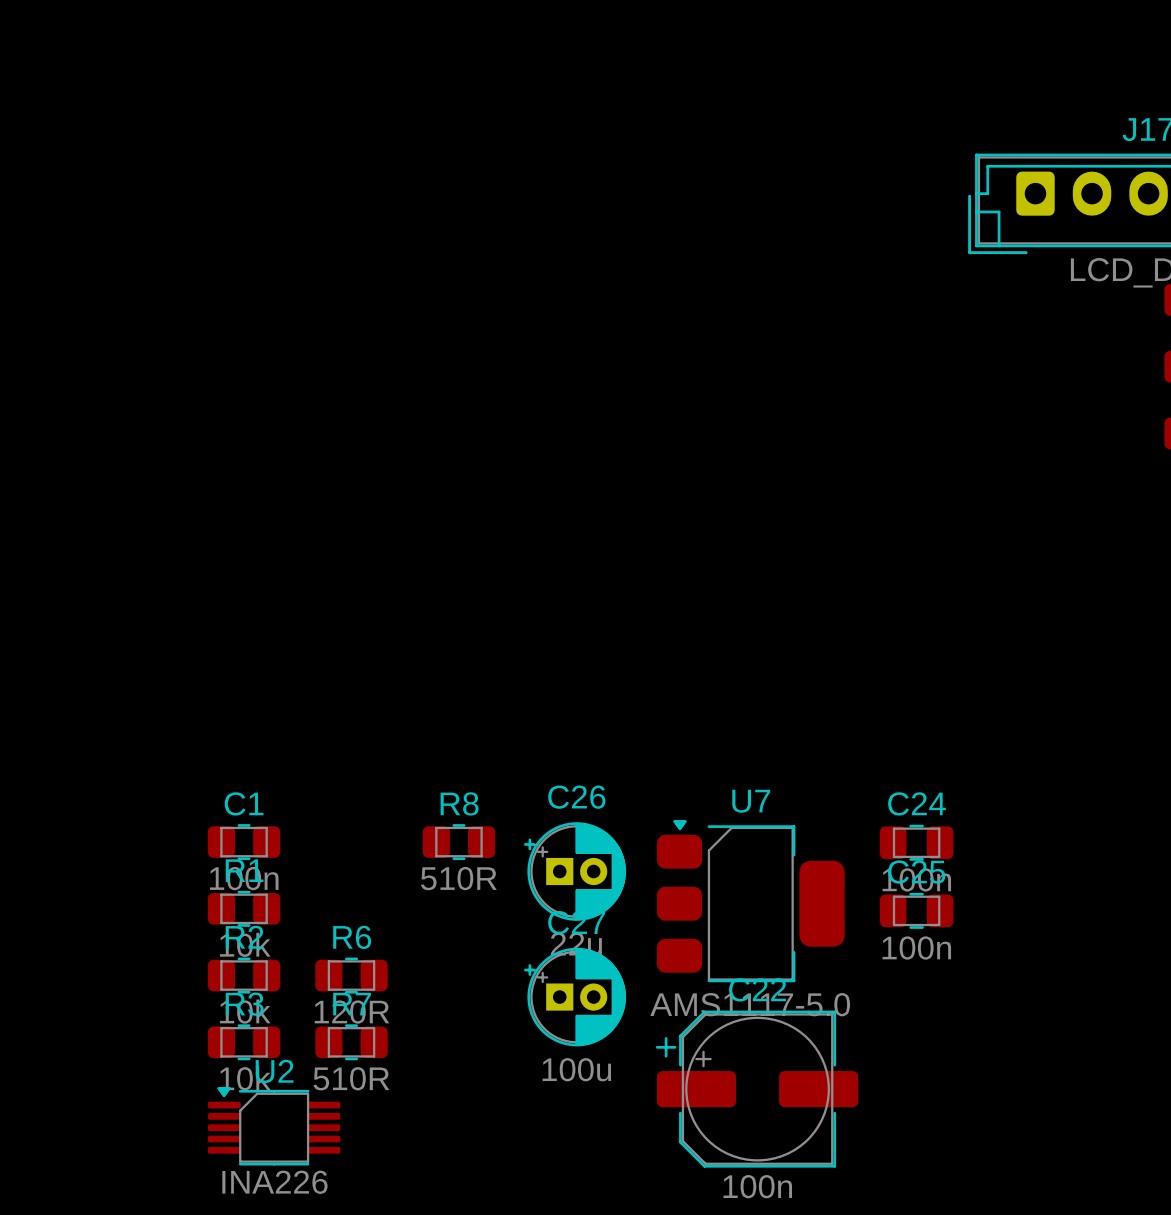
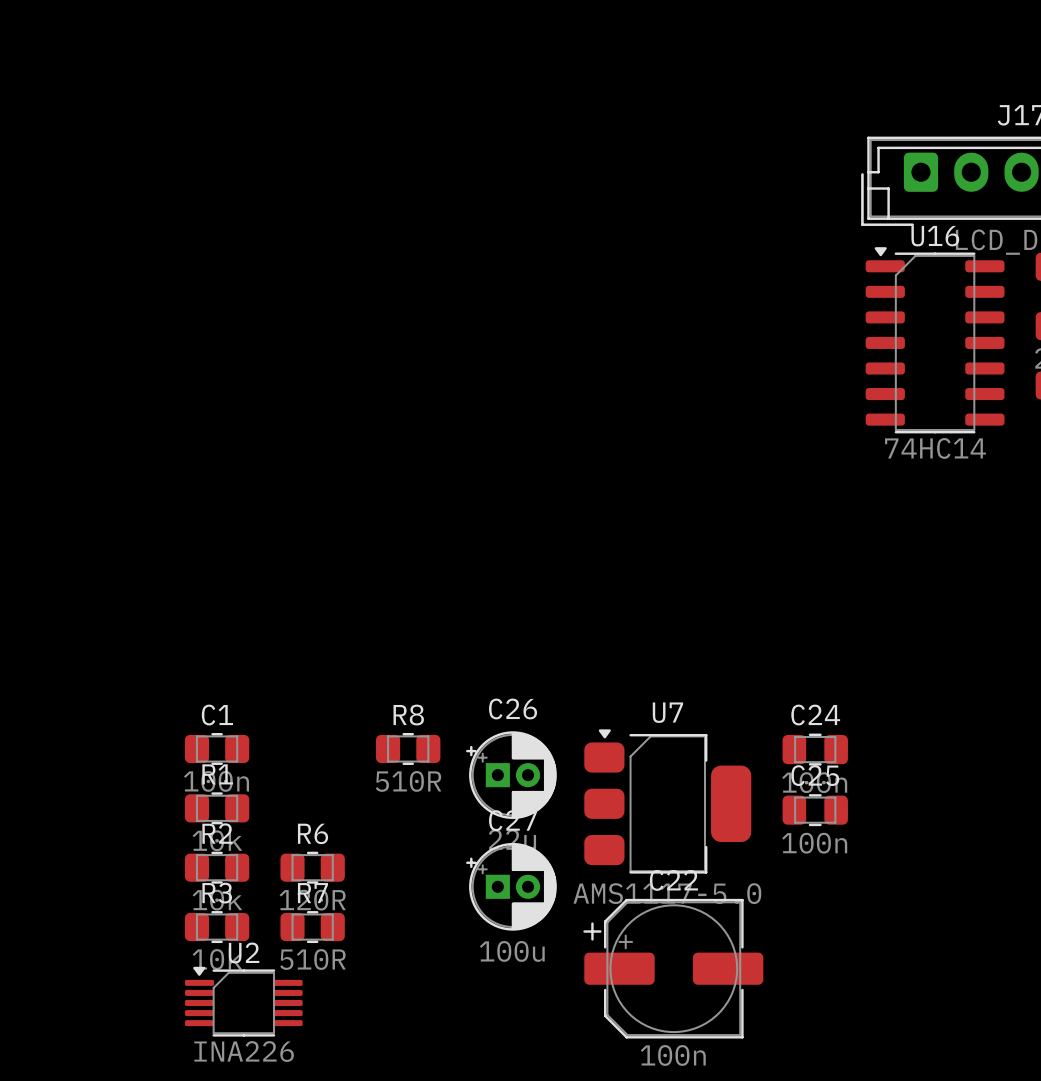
U16: none -> 74HC14 (935, 340)

